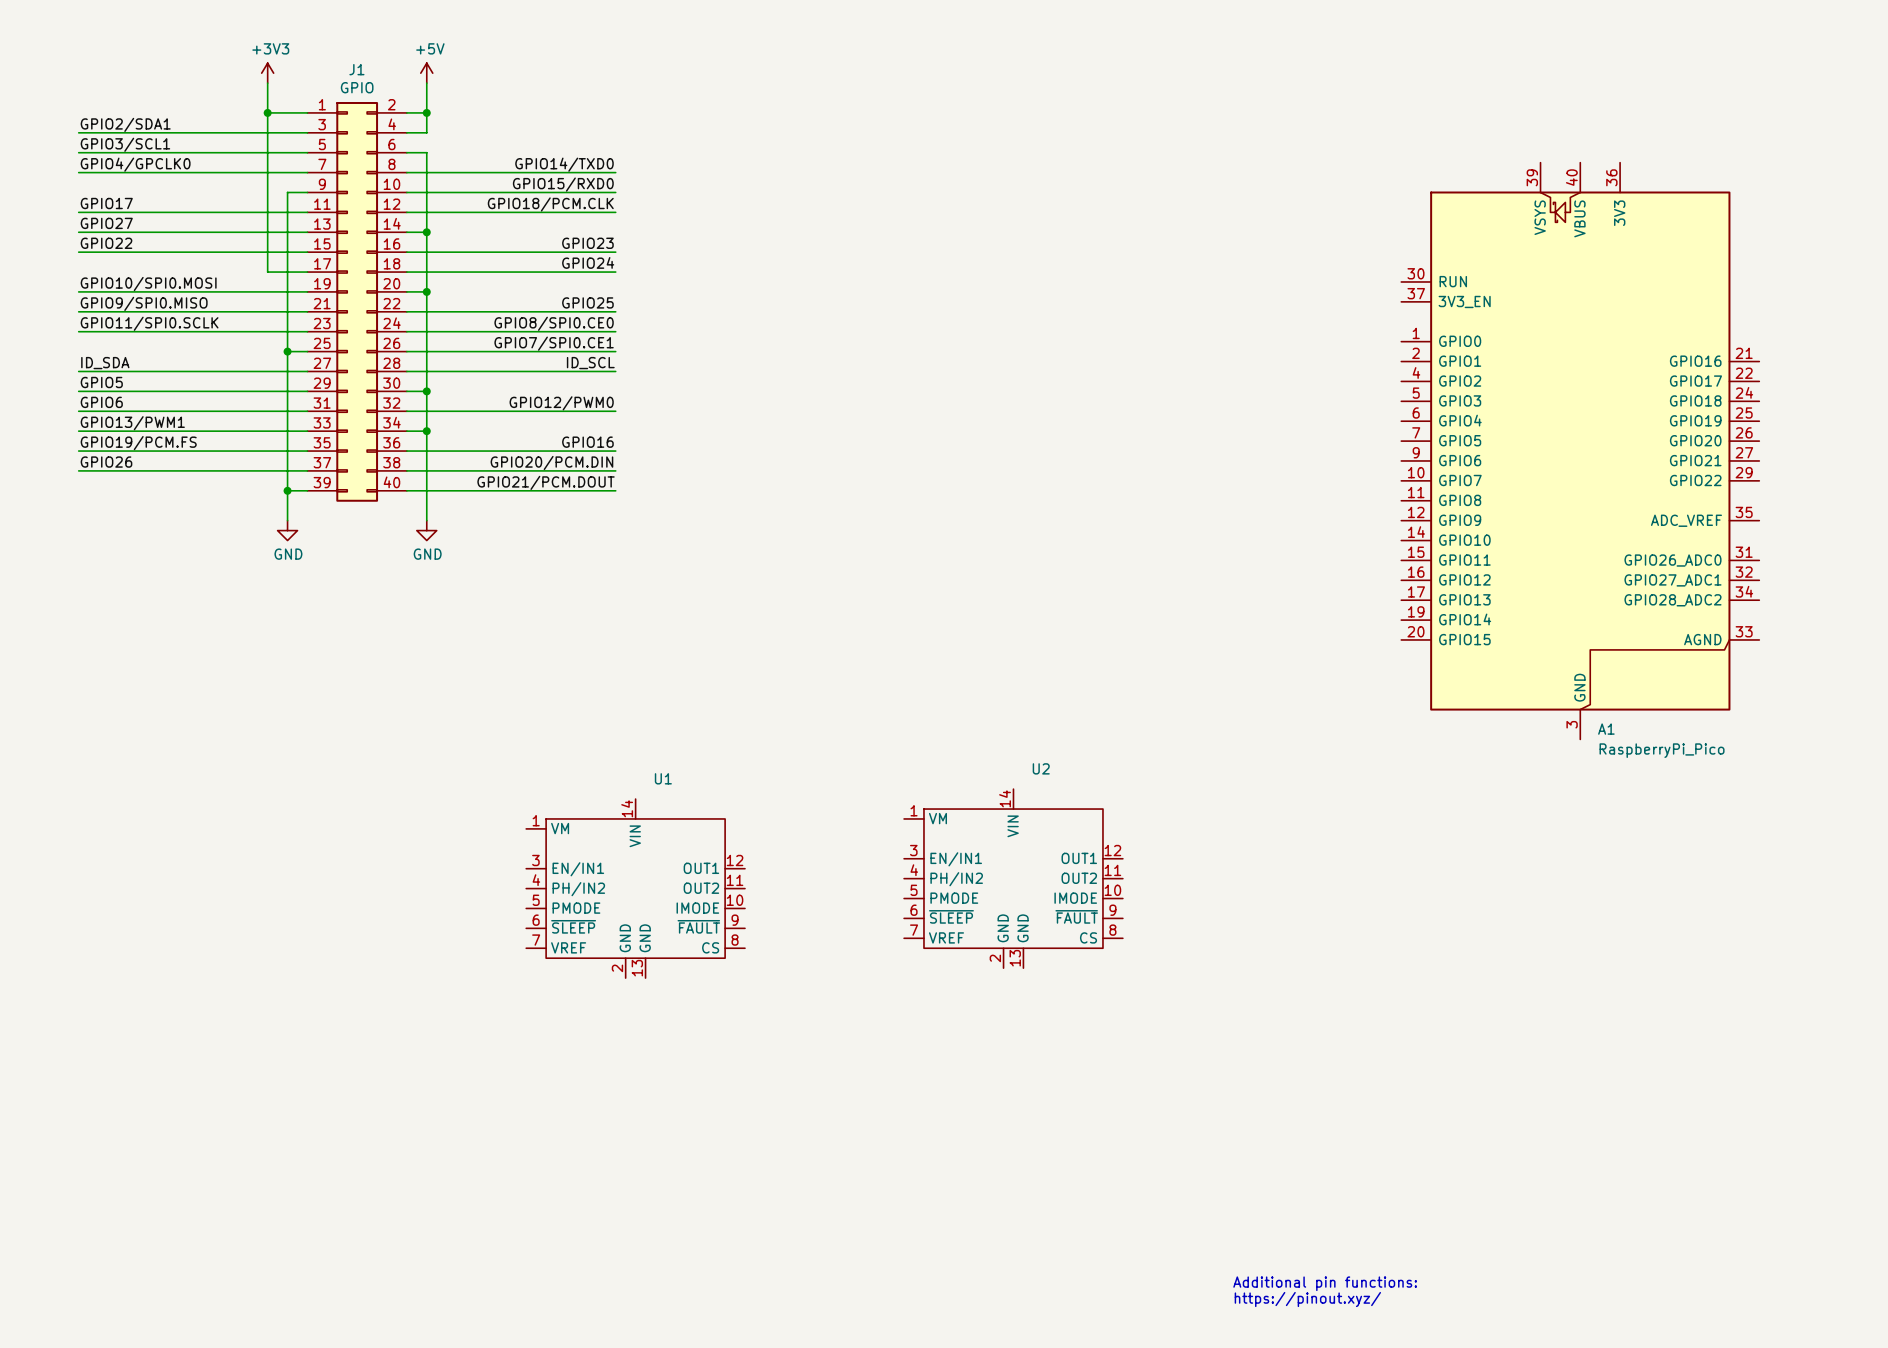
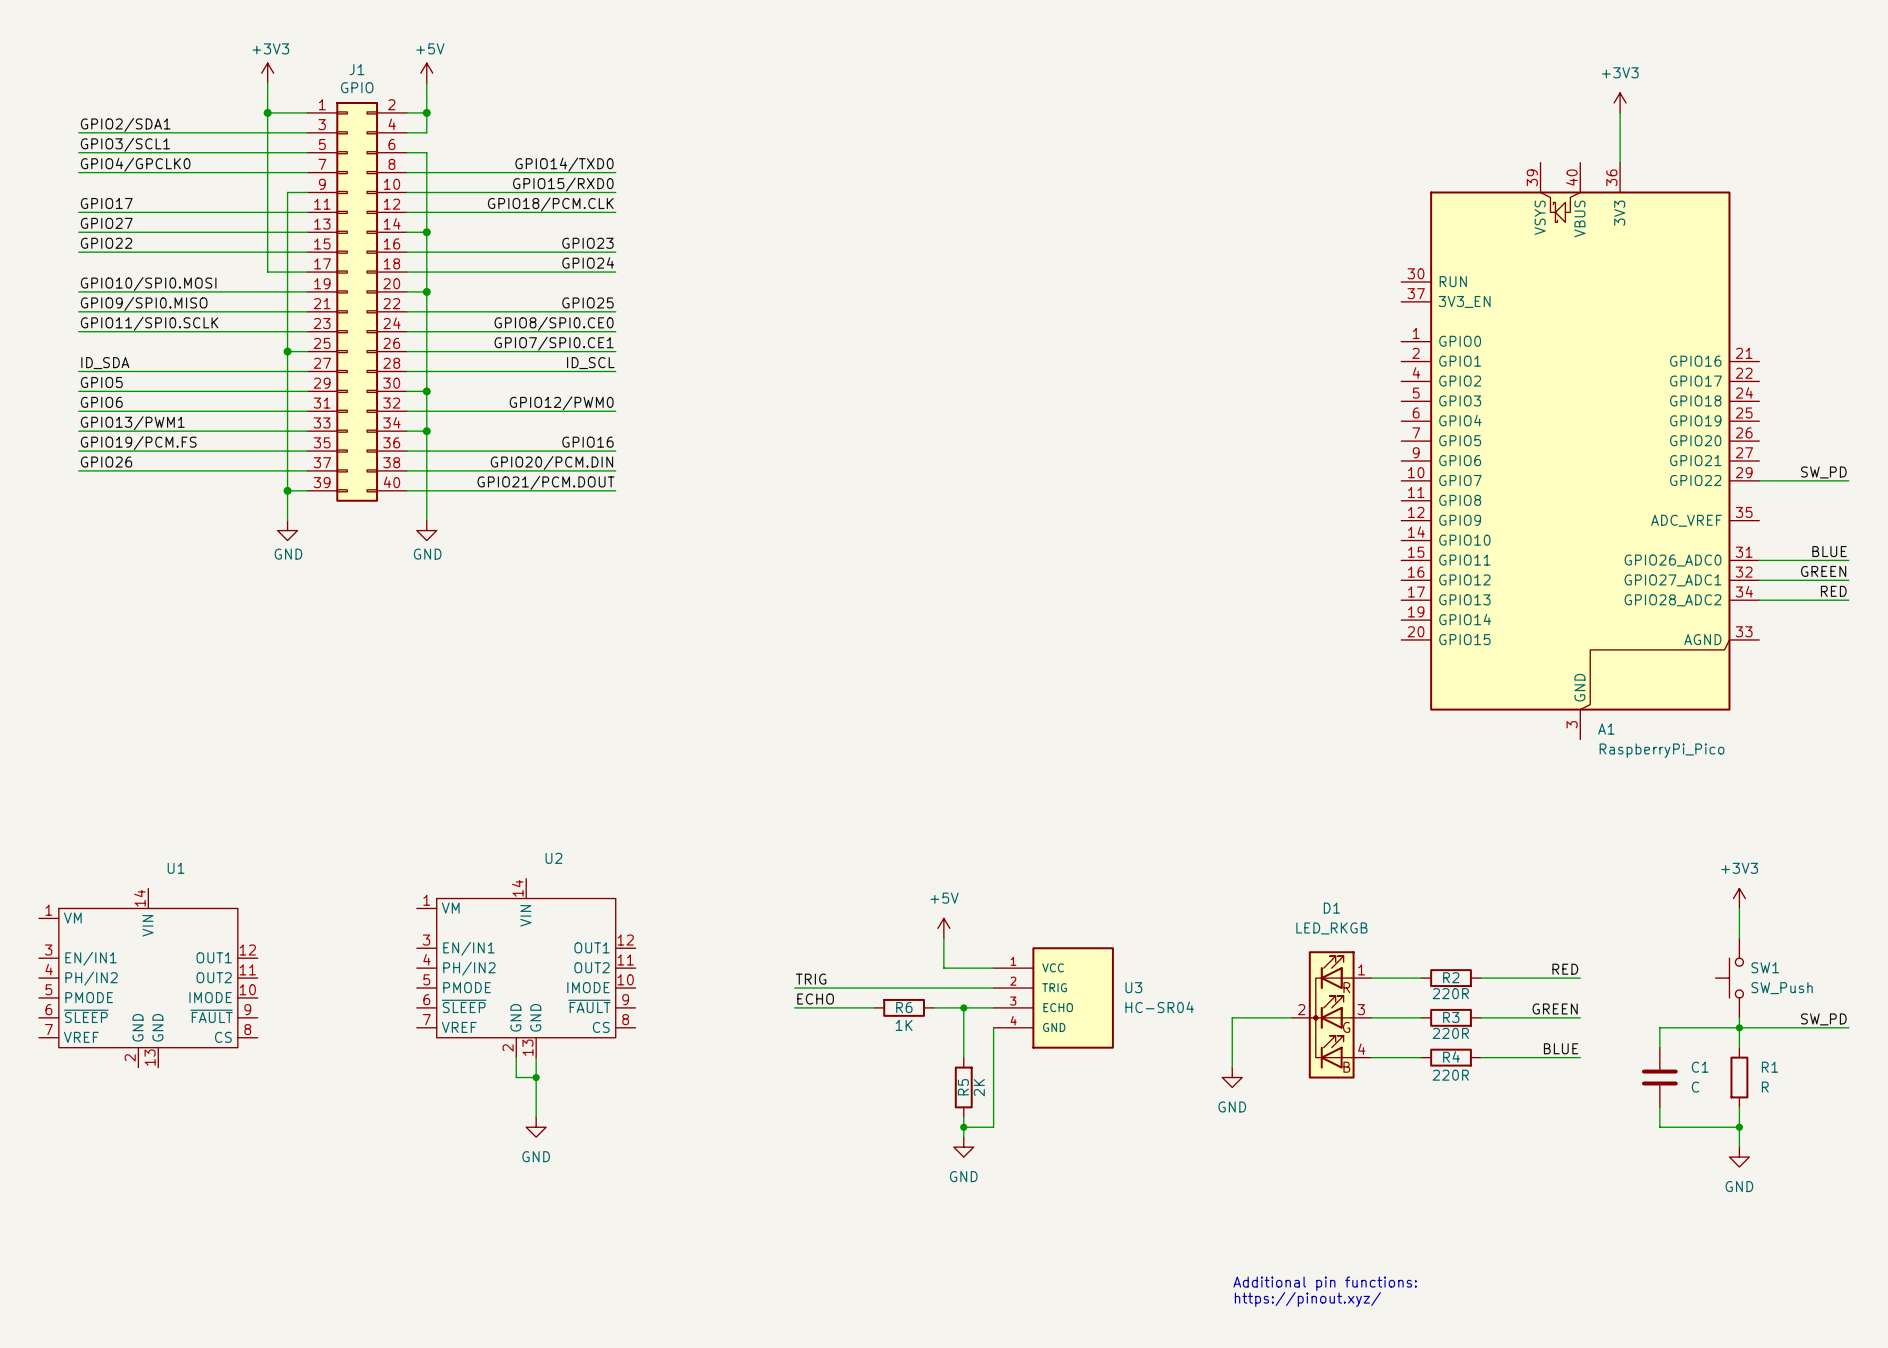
power symbol: none -> +3V3 (1620, 102)
wire: none -> (1620, 112) (1620, 162)
label: none -> SW_PD (1823, 472)
wire: none -> (1759, 480) (1848, 480)
label: none -> BLUE (1829, 551)
wire: none -> (1759, 560) (1848, 560)
label: none -> GREEN (1823, 571)
wire: none -> (1759, 580) (1848, 580)
label: none -> RED (1833, 591)
wire: none -> (1759, 600) (1848, 600)
U2 position: (1013, 878) -> (526, 968)
U1 position: (635, 888) -> (148, 978)
power symbol: none -> +3V3 (1739, 898)
wire: none -> (1739, 908) (1739, 938)
power symbol: none -> +5V (943, 928)
wire: none -> (943, 938) (943, 968) (993, 968)
label: none -> RED (1565, 969)
wire: none -> (1371, 978) (1421, 978)
R2: none -> 220R (1451, 978)
wire: none -> (1480, 978) (1580, 978)
SW1: none -> SW_Push (1729, 978)
label: none -> TRIG (811, 979)
wire: none -> (794, 988) (993, 988)
U3: none -> HC-SR04 (1053, 997)
label: none -> ECHO (815, 999)
wire: none -> (794, 1007) (874, 1007)
R6: none -> 1K (904, 1007)
wire: none -> (933, 1007) (993, 1007)
wire: none -> (963, 1007) (963, 1057)
junction: none -> (963, 1007)
label: none -> GREEN (1555, 1008)
D1: none -> LED_RKGB (1331, 1014)
wire: none -> (1291, 1017) (1232, 1017) (1232, 1067)
wire: none -> (1371, 1017) (1421, 1017)
R3: none -> 220R (1451, 1017)
wire: none -> (1480, 1017) (1580, 1017)
wire: none -> (1739, 1017) (1739, 1047)
label: none -> SW_PD (1823, 1019)
wire: none -> (993, 1027) (993, 1127) (963, 1127)
junction: none -> (1739, 1027)
wire: none -> (1848, 1027) (1659, 1027) (1659, 1047)
label: none -> BLUE (1561, 1048)
wire: none -> (516, 1057) (516, 1077) (536, 1077)
wire: none -> (536, 1057) (536, 1117)
wire: none -> (1371, 1057) (1421, 1057)
R4: none -> 220R (1451, 1057)
wire: none -> (1480, 1057) (1580, 1057)
junction: none -> (536, 1077)
power symbol: none -> GND (1232, 1077)
C1: none -> C (1659, 1077)
R1: none -> R (1739, 1077)
R5: none -> 2K (963, 1087)
wire: none -> (1659, 1107) (1659, 1127) (1739, 1127)
wire: none -> (1739, 1107) (1739, 1147)
wire: none -> (963, 1117) (963, 1137)
power symbol: none -> GND (536, 1127)
junction: none -> (963, 1127)
junction: none -> (1739, 1127)
power symbol: none -> GND (963, 1147)
power symbol: none -> GND (1739, 1157)

